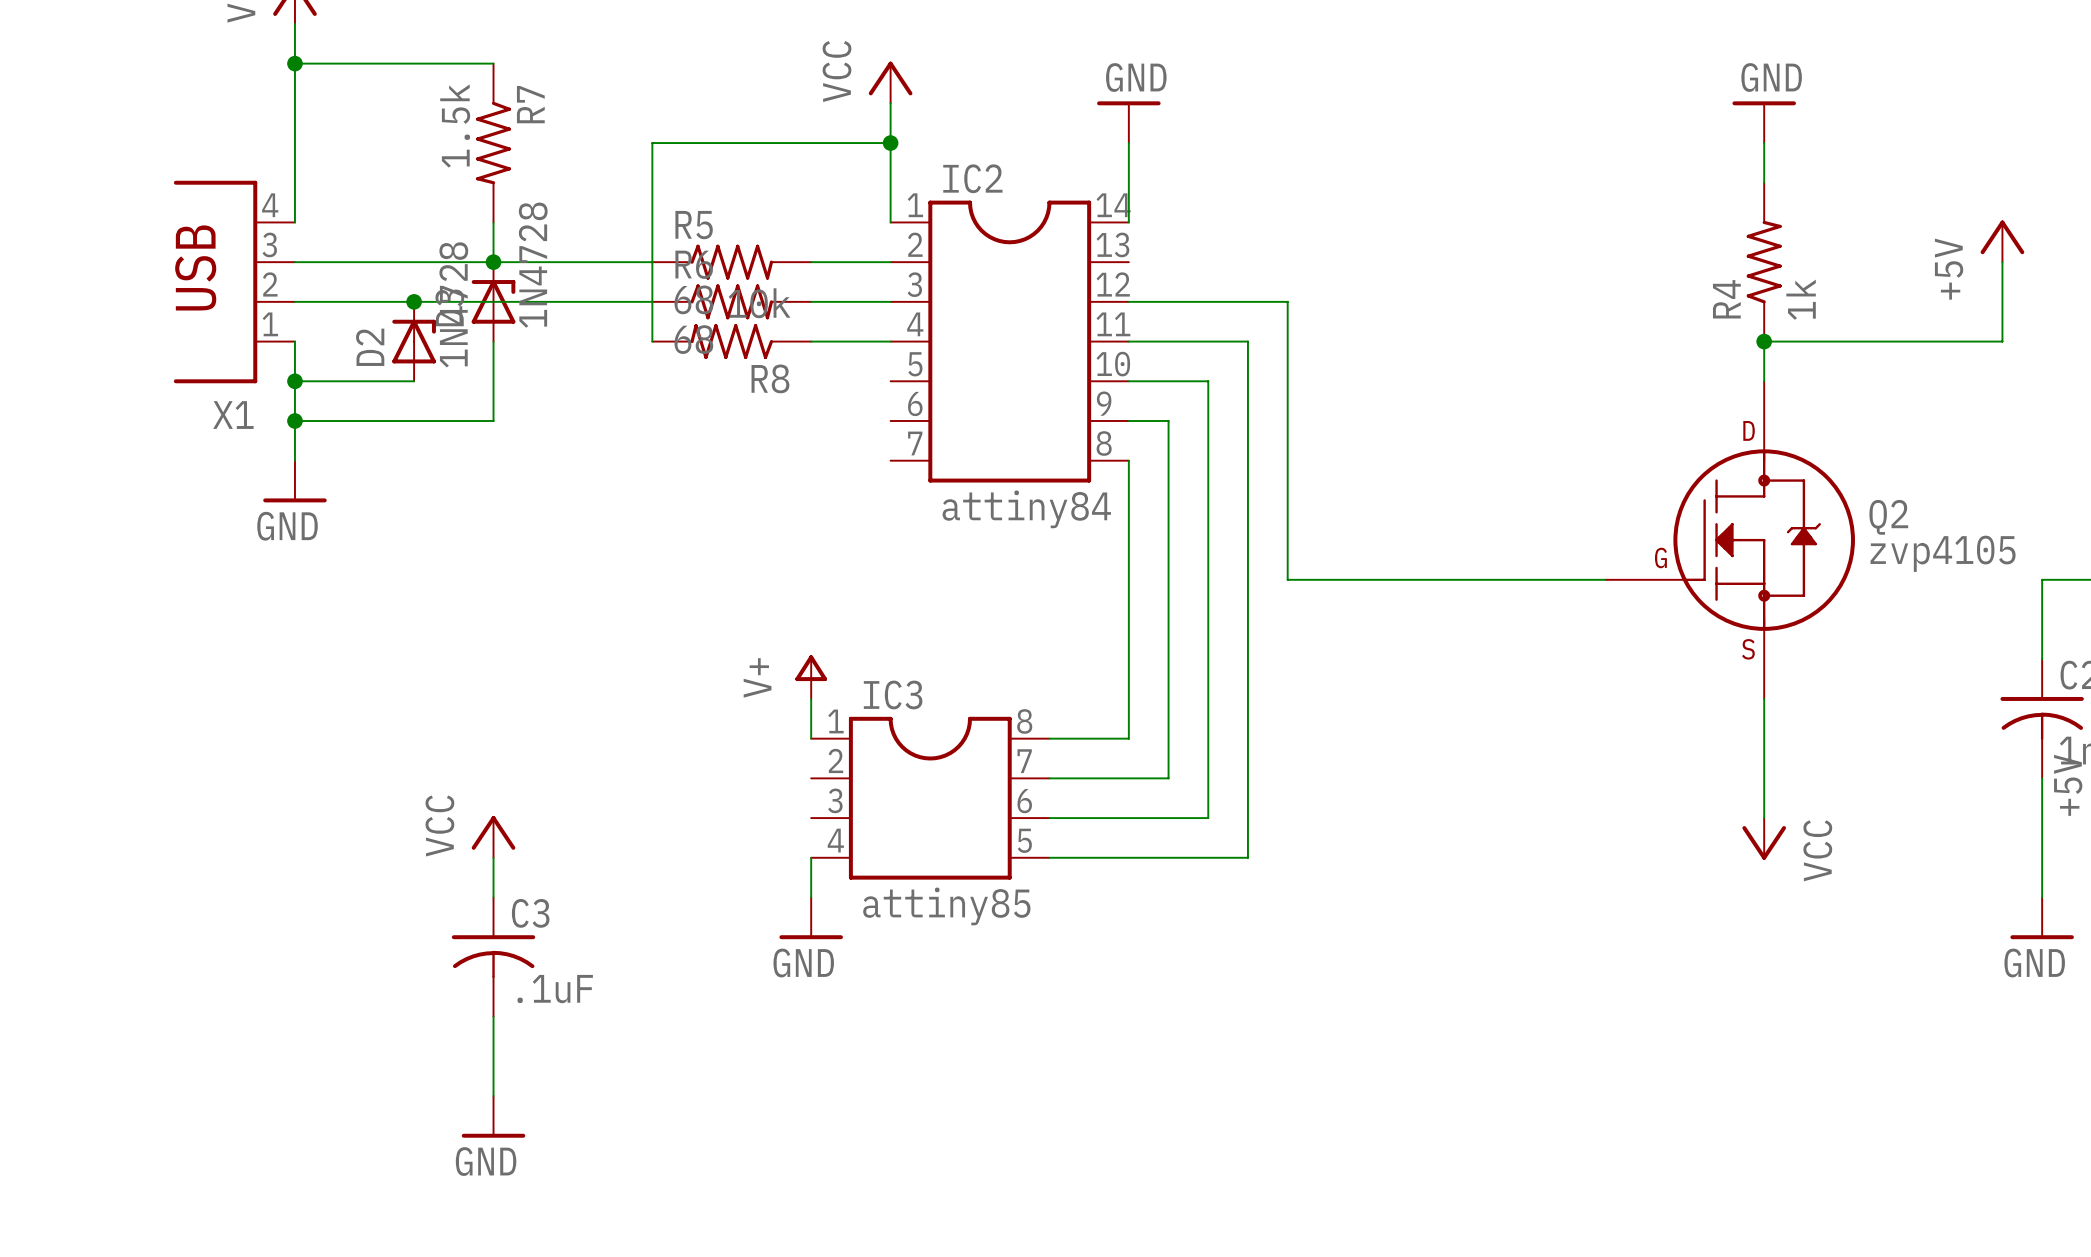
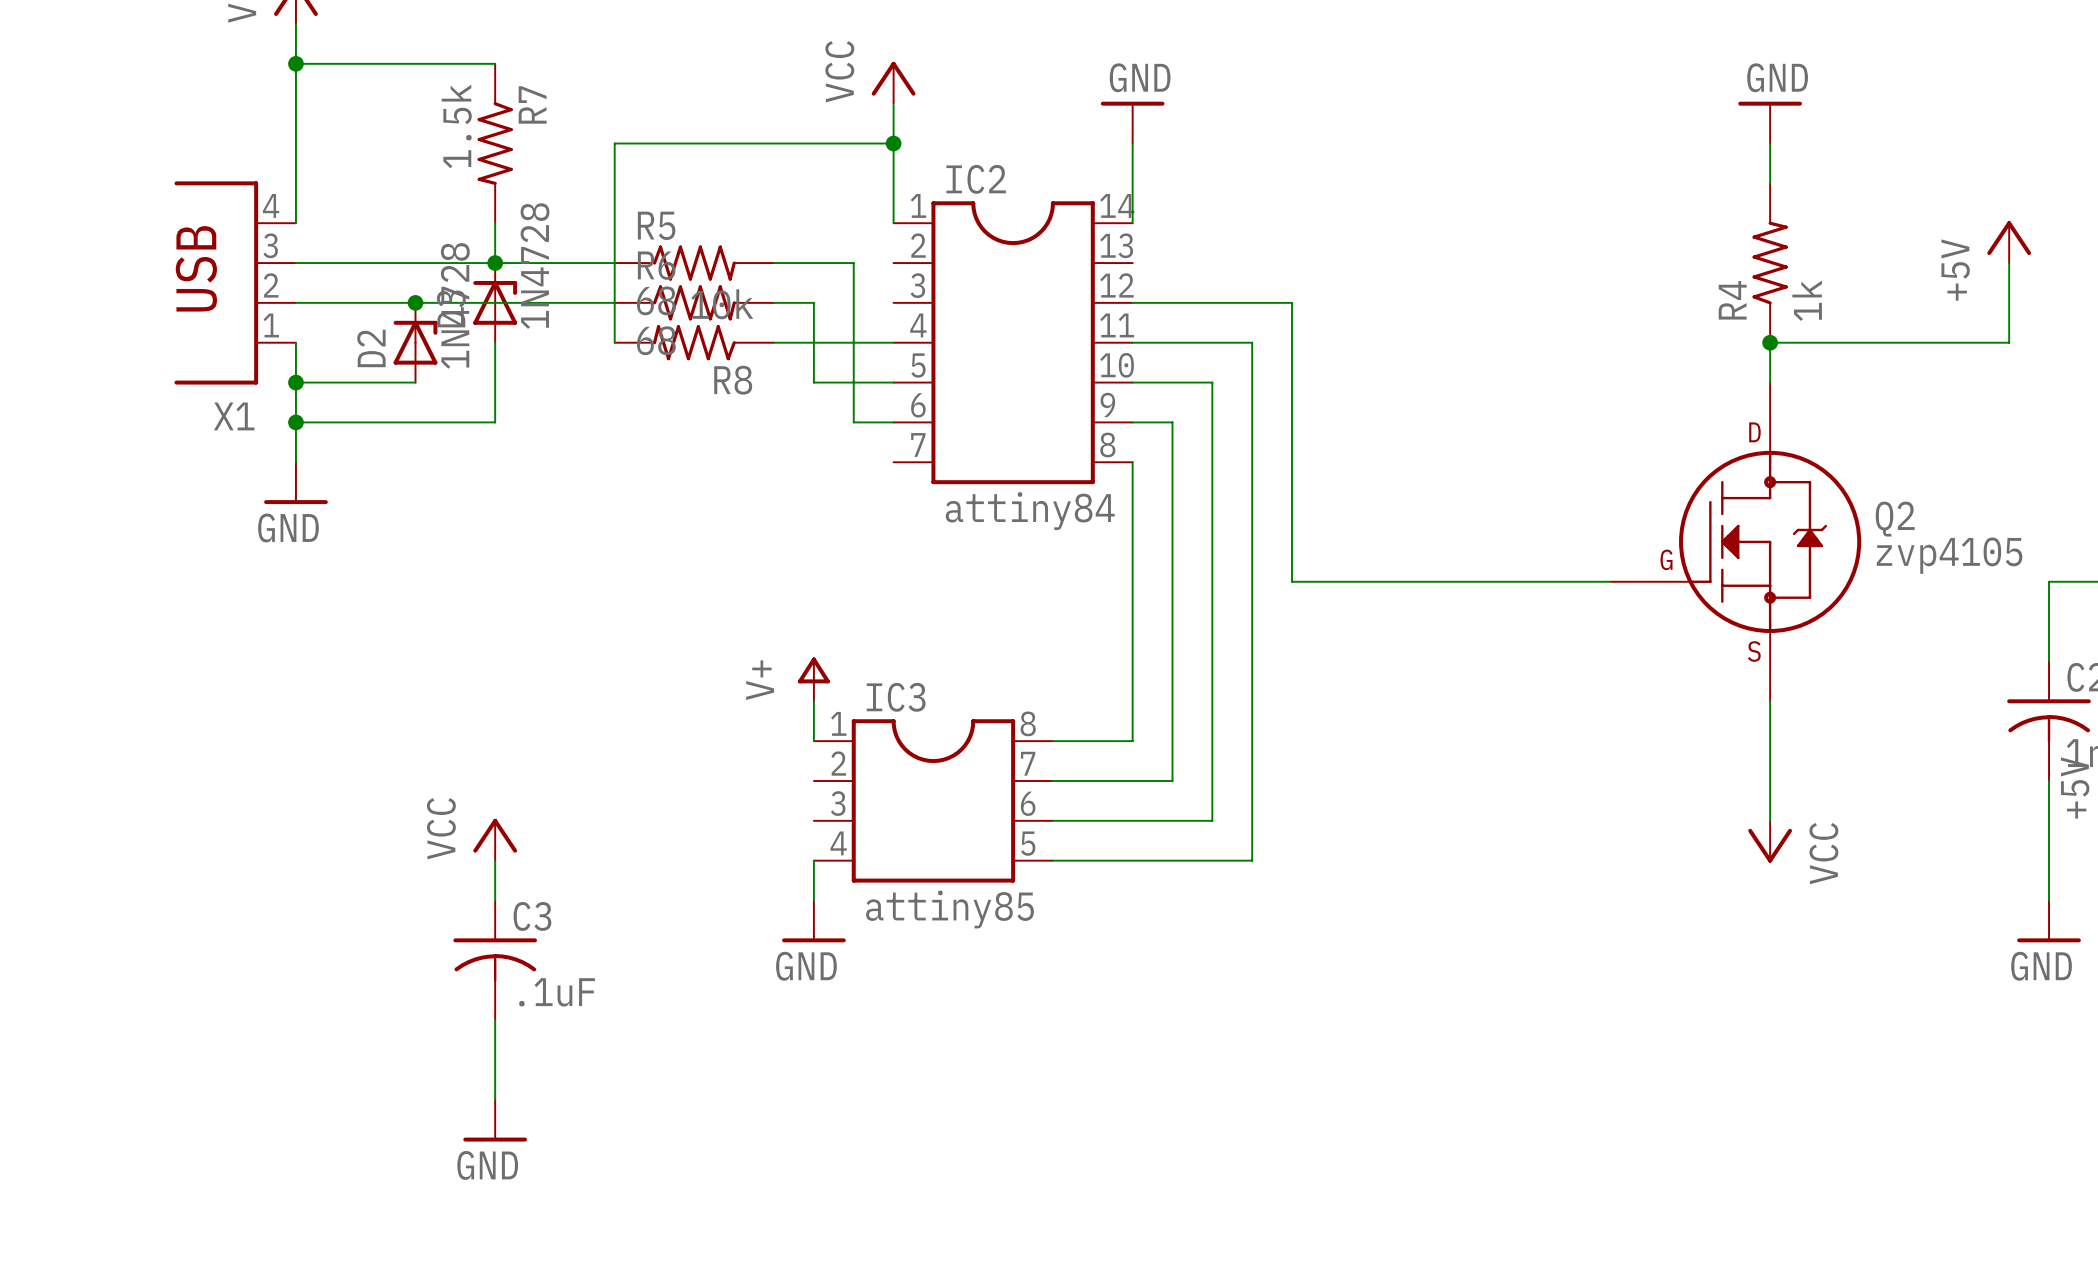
wire: (652, 143) (652, 341) -> (654, 143) (614, 143) (614, 342)
R5 position: (731, 262) -> (694, 263)
wire: (850, 262) (890, 262) -> (853, 263) (853, 422) (893, 422)
R6 position: (731, 301) -> (694, 302)
wire: none -> (774, 302) (813, 302) (813, 382) (893, 382)
wire: (811, 301) (890, 301) -> none
R8 position: (731, 341) -> (694, 342)

